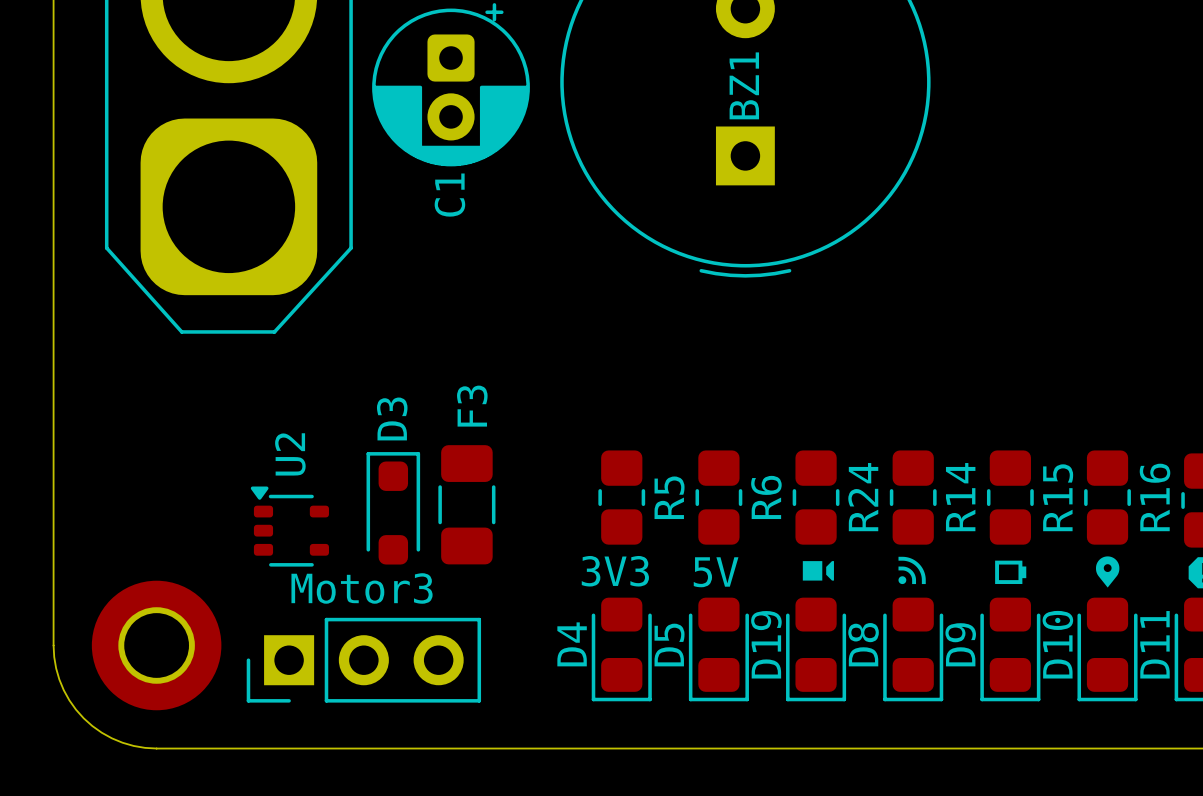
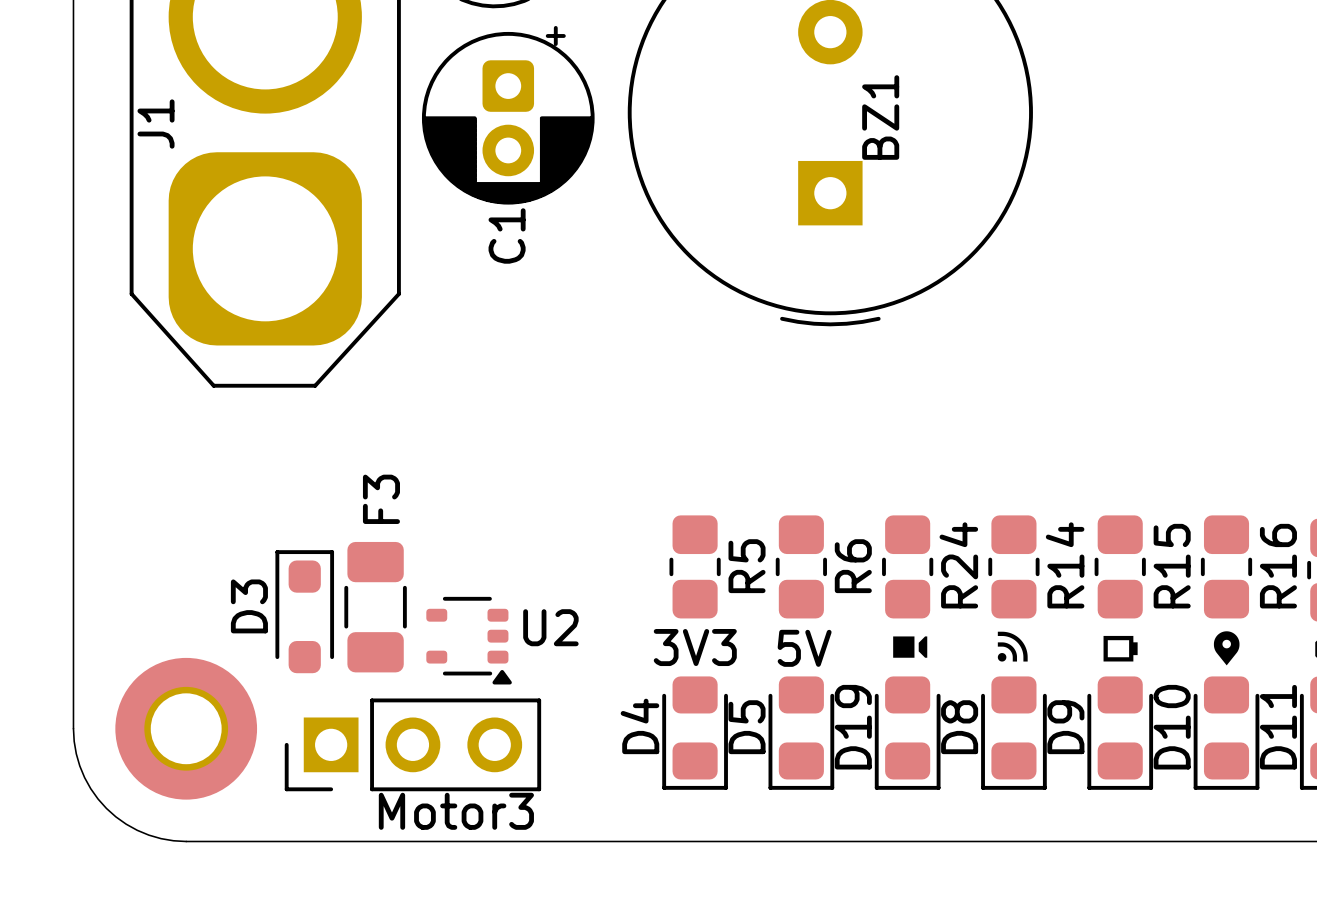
BZ1 name position: BZ1 (744, 85) -> BZ1 (880, 117)
J1 name: none -> J1 (156, 124)
D3 name position: D3 (392, 418) -> D3 (249, 606)
U2 name position: U2 (290, 454) -> U2 (550, 627)
F3 position: (466, 504) -> (375, 607)
D3 position: (393, 508) -> (304, 611)
U2 rotation: 0° (289, 526) -> 180° (469, 640)
U2 position: (289, 526) -> (469, 640)
Motor3 name position: Motor3 (362, 588) -> Motor3 (456, 811)

